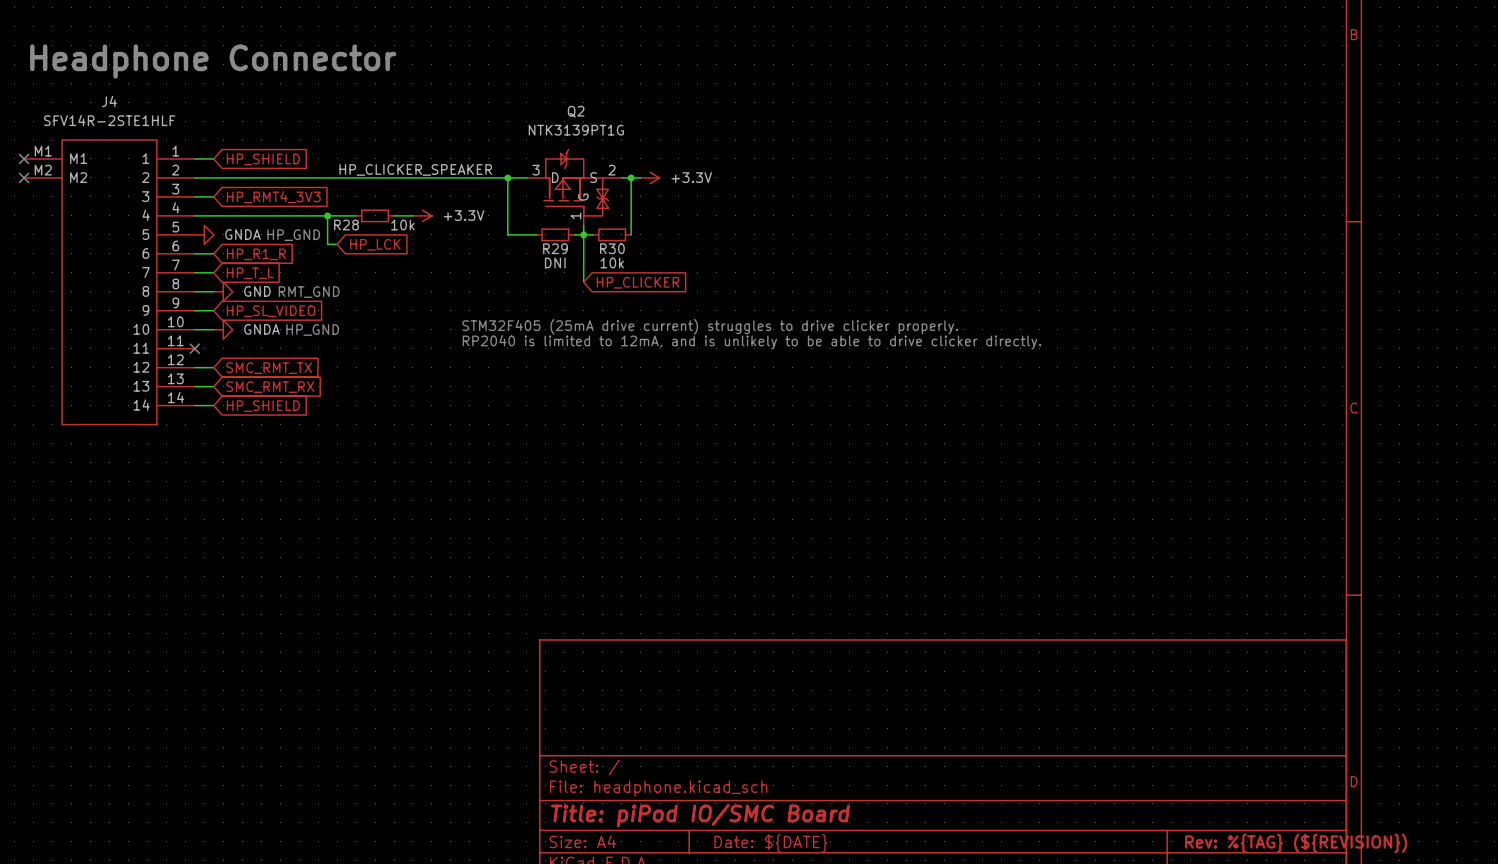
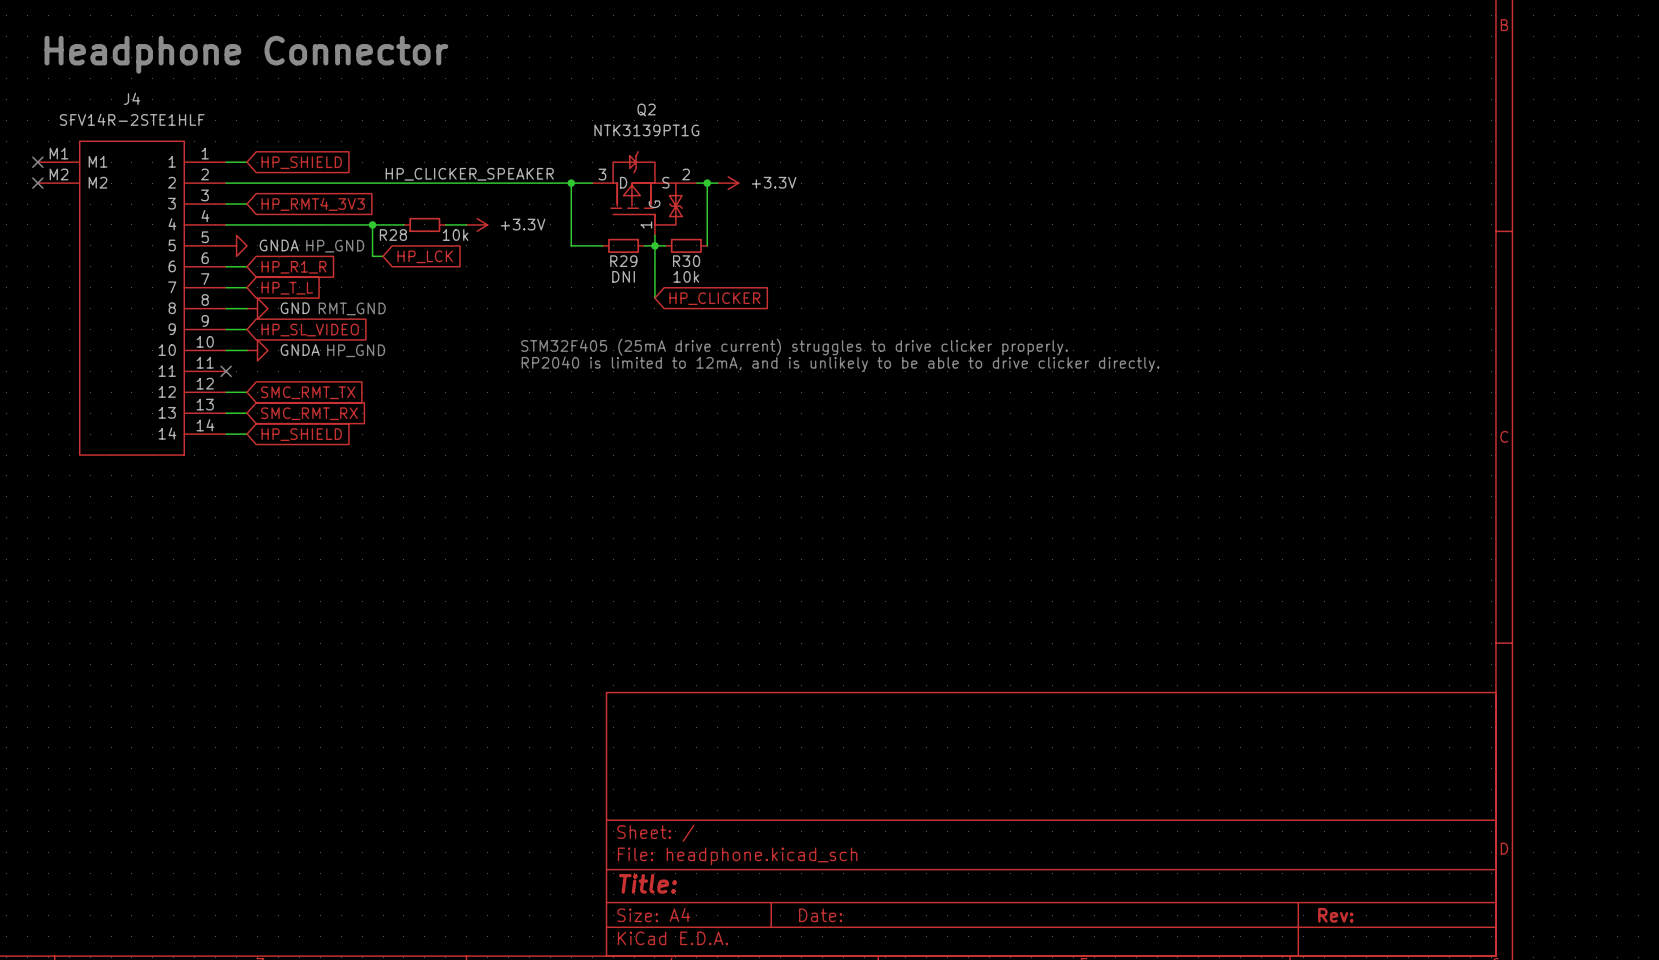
title block: Title: piPod IO/SMC Board (700, 815) -> Title: (647, 883)
title block: Date: ${DATE} (770, 843) -> Date: (820, 915)
title block: Rev: %{TAG} (${REVISION}) (1296, 843) -> Rev: (1335, 915)

